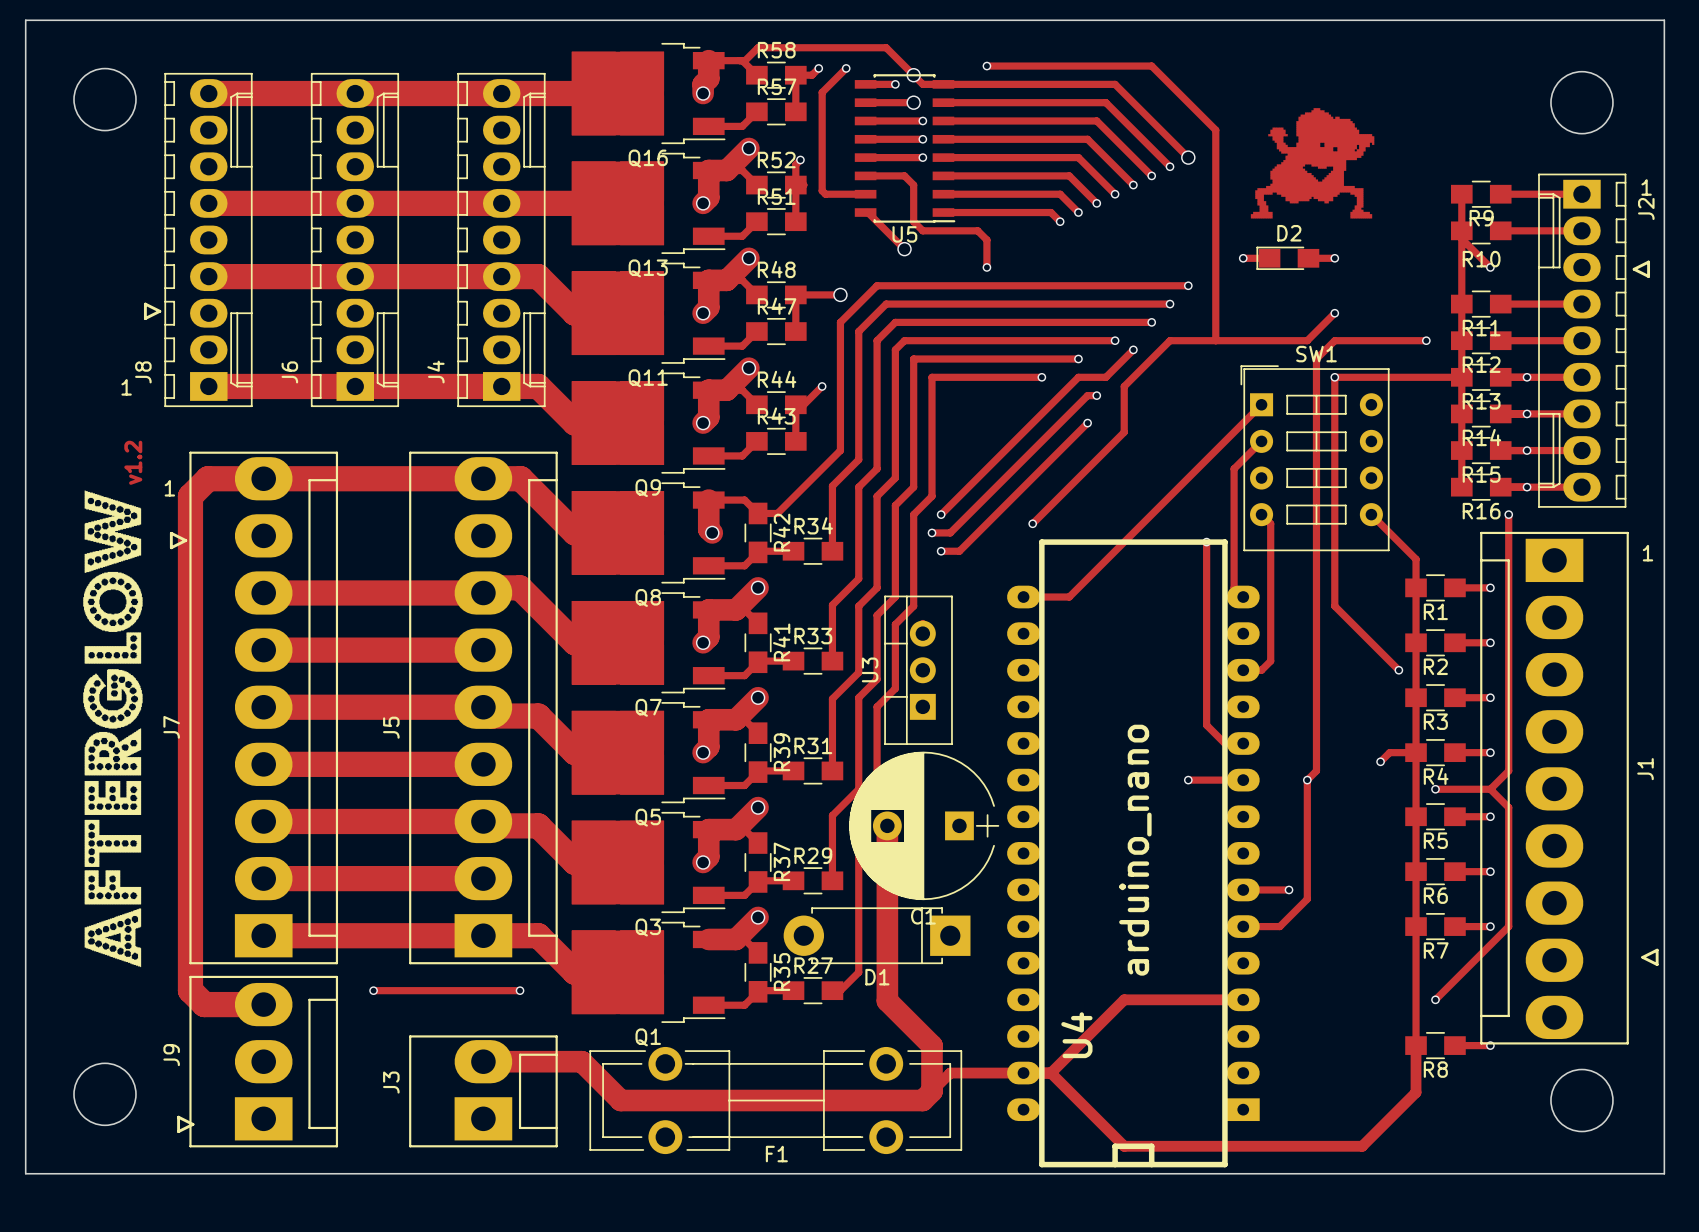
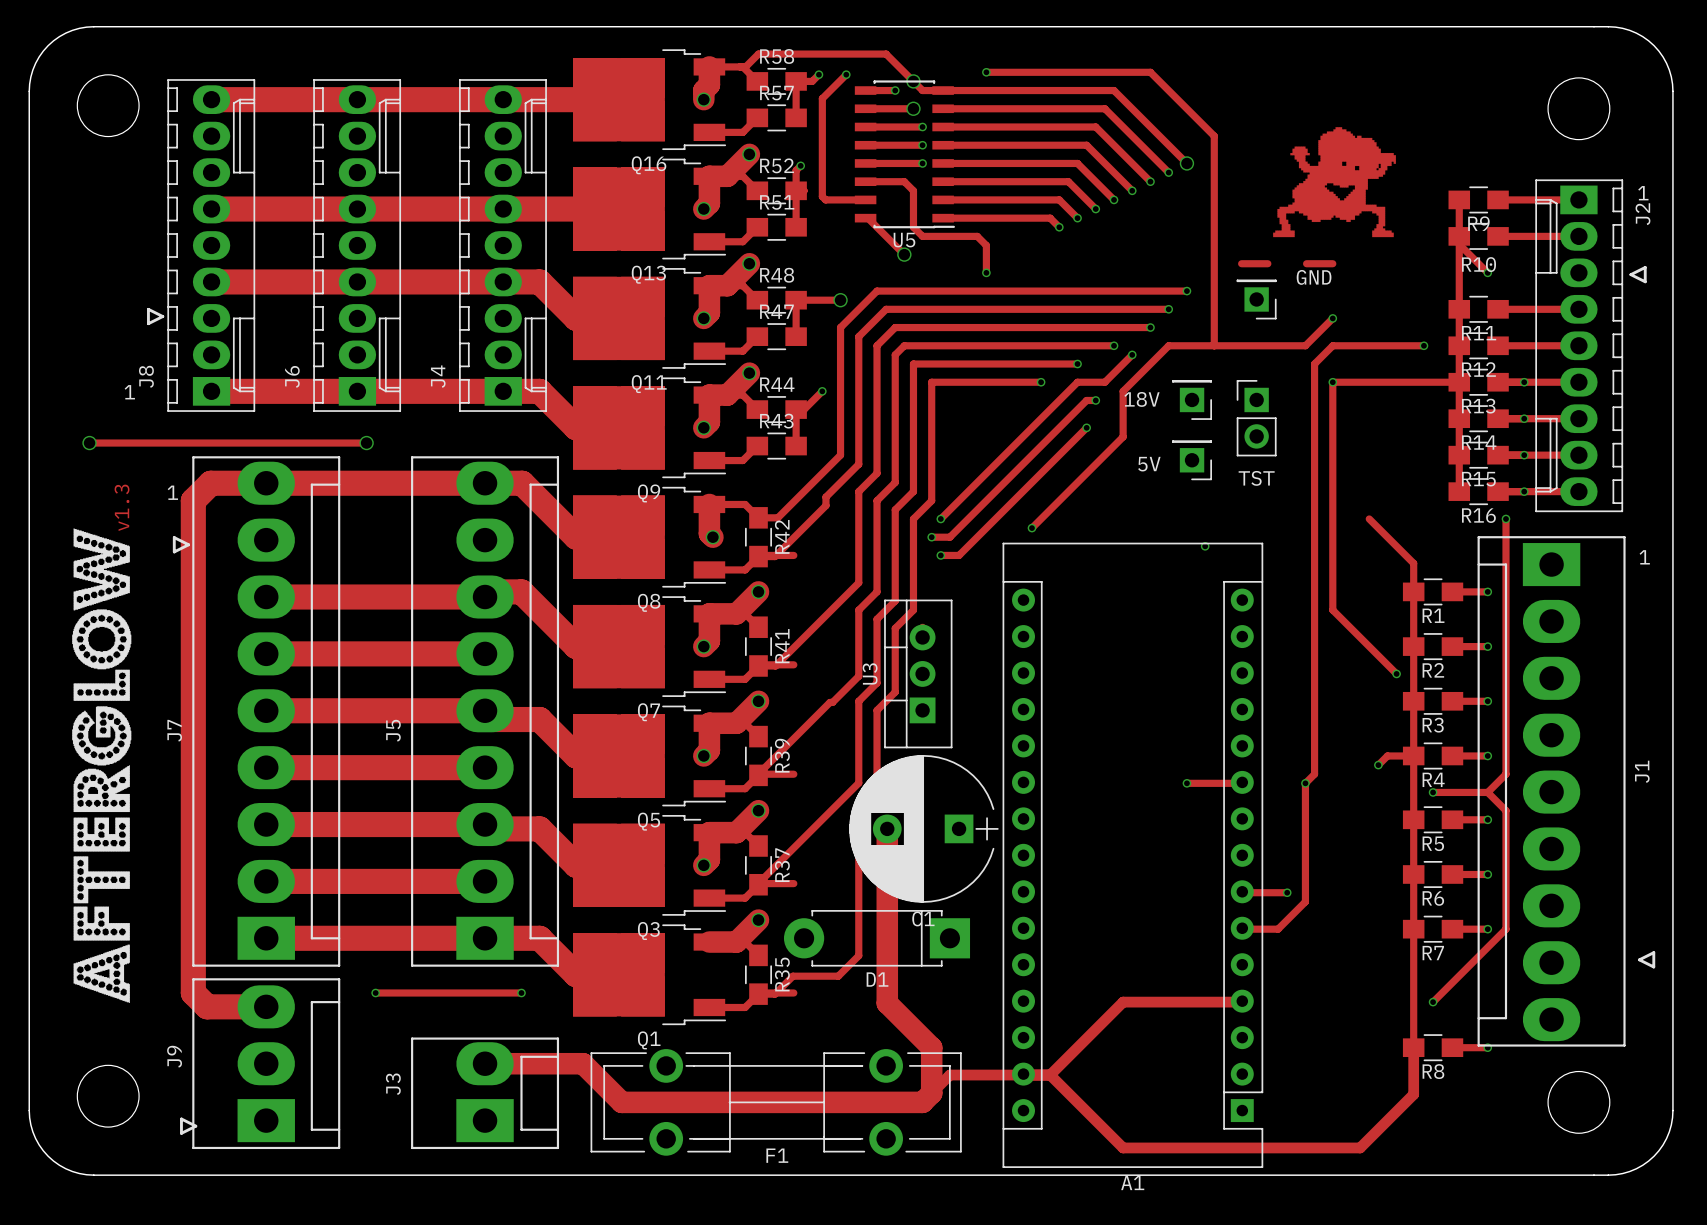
board edge: (90, 20) (25, 20) (25, 85) -> (93, 26) (79, 28) (65, 33) (48, 45) (35, 63) (30, 76) (29, 91)
board edge: (1611, 20) (1664, 20) (1664, 1173) (25, 1173) -> (1608, 26) (1622, 28) (1636, 33) (1654, 45) (1663, 56) (1669, 69) (1672, 91) (1672, 1110) (1671, 1124) (1666, 1138) (1654, 1156) (1642, 1165) (1629, 1171) (1608, 1175) (93, 1175) (72, 1171) (59, 1165) (48, 1156) (35, 1138) (30, 1124) (29, 1110)
drawing position: (1312, 163) -> (1334, 182)
via: (1243, 258) -> none
D2: (1287, 258) -> none
via: (1334, 258) -> none
GND: none -> (1256, 299)
18V: none -> (1192, 399)
track: (1261, 404) (1069, 597) (1023, 597) -> none
TST: none -> (1256, 418)
track: none -> (89, 443) (366, 443)
via: none -> (89, 443)
via: none -> (366, 443)
track: (1261, 441) (1234, 468) (1234, 587) (1243, 597) -> none
5V: none -> (1192, 460)
SW1: (1315, 458) -> none
text: v1.2 (133, 462) -> v1.3 (122, 507)
track: (832, 486) (832, 551) -> (832, 490) (825, 497) (825, 505) (775, 556) (758, 556)
track: (1261, 514) (1270, 523) (1270, 661) (1261, 670) (1243, 670) -> none
track: (1206, 542) (1206, 725) (1224, 743) (1243, 743) -> none
R34: (812, 551) -> none
track: (832, 605) (832, 661) -> (832, 608) (775, 665) (758, 665)
R33: (812, 661) -> none
track: (832, 698) (832, 770) -> (832, 702) (829, 702) (758, 775)
drawing position: (112, 728) -> (101, 765)
R31: (812, 770) -> none
track: (858, 779) (858, 789) (832, 815) (832, 880) -> (858, 783) (758, 884)
A1: none -> (1132, 855)
U4: arduino_nano (1133, 853) -> none
R29: (812, 880) -> none
track: (858, 953) (858, 972) (840, 990) (832, 990) -> (858, 955) (838, 976) (792, 976) (775, 994) (758, 994)
R27: (812, 990) -> none
board edge: (25, 1108) (25, 1173) -> none

